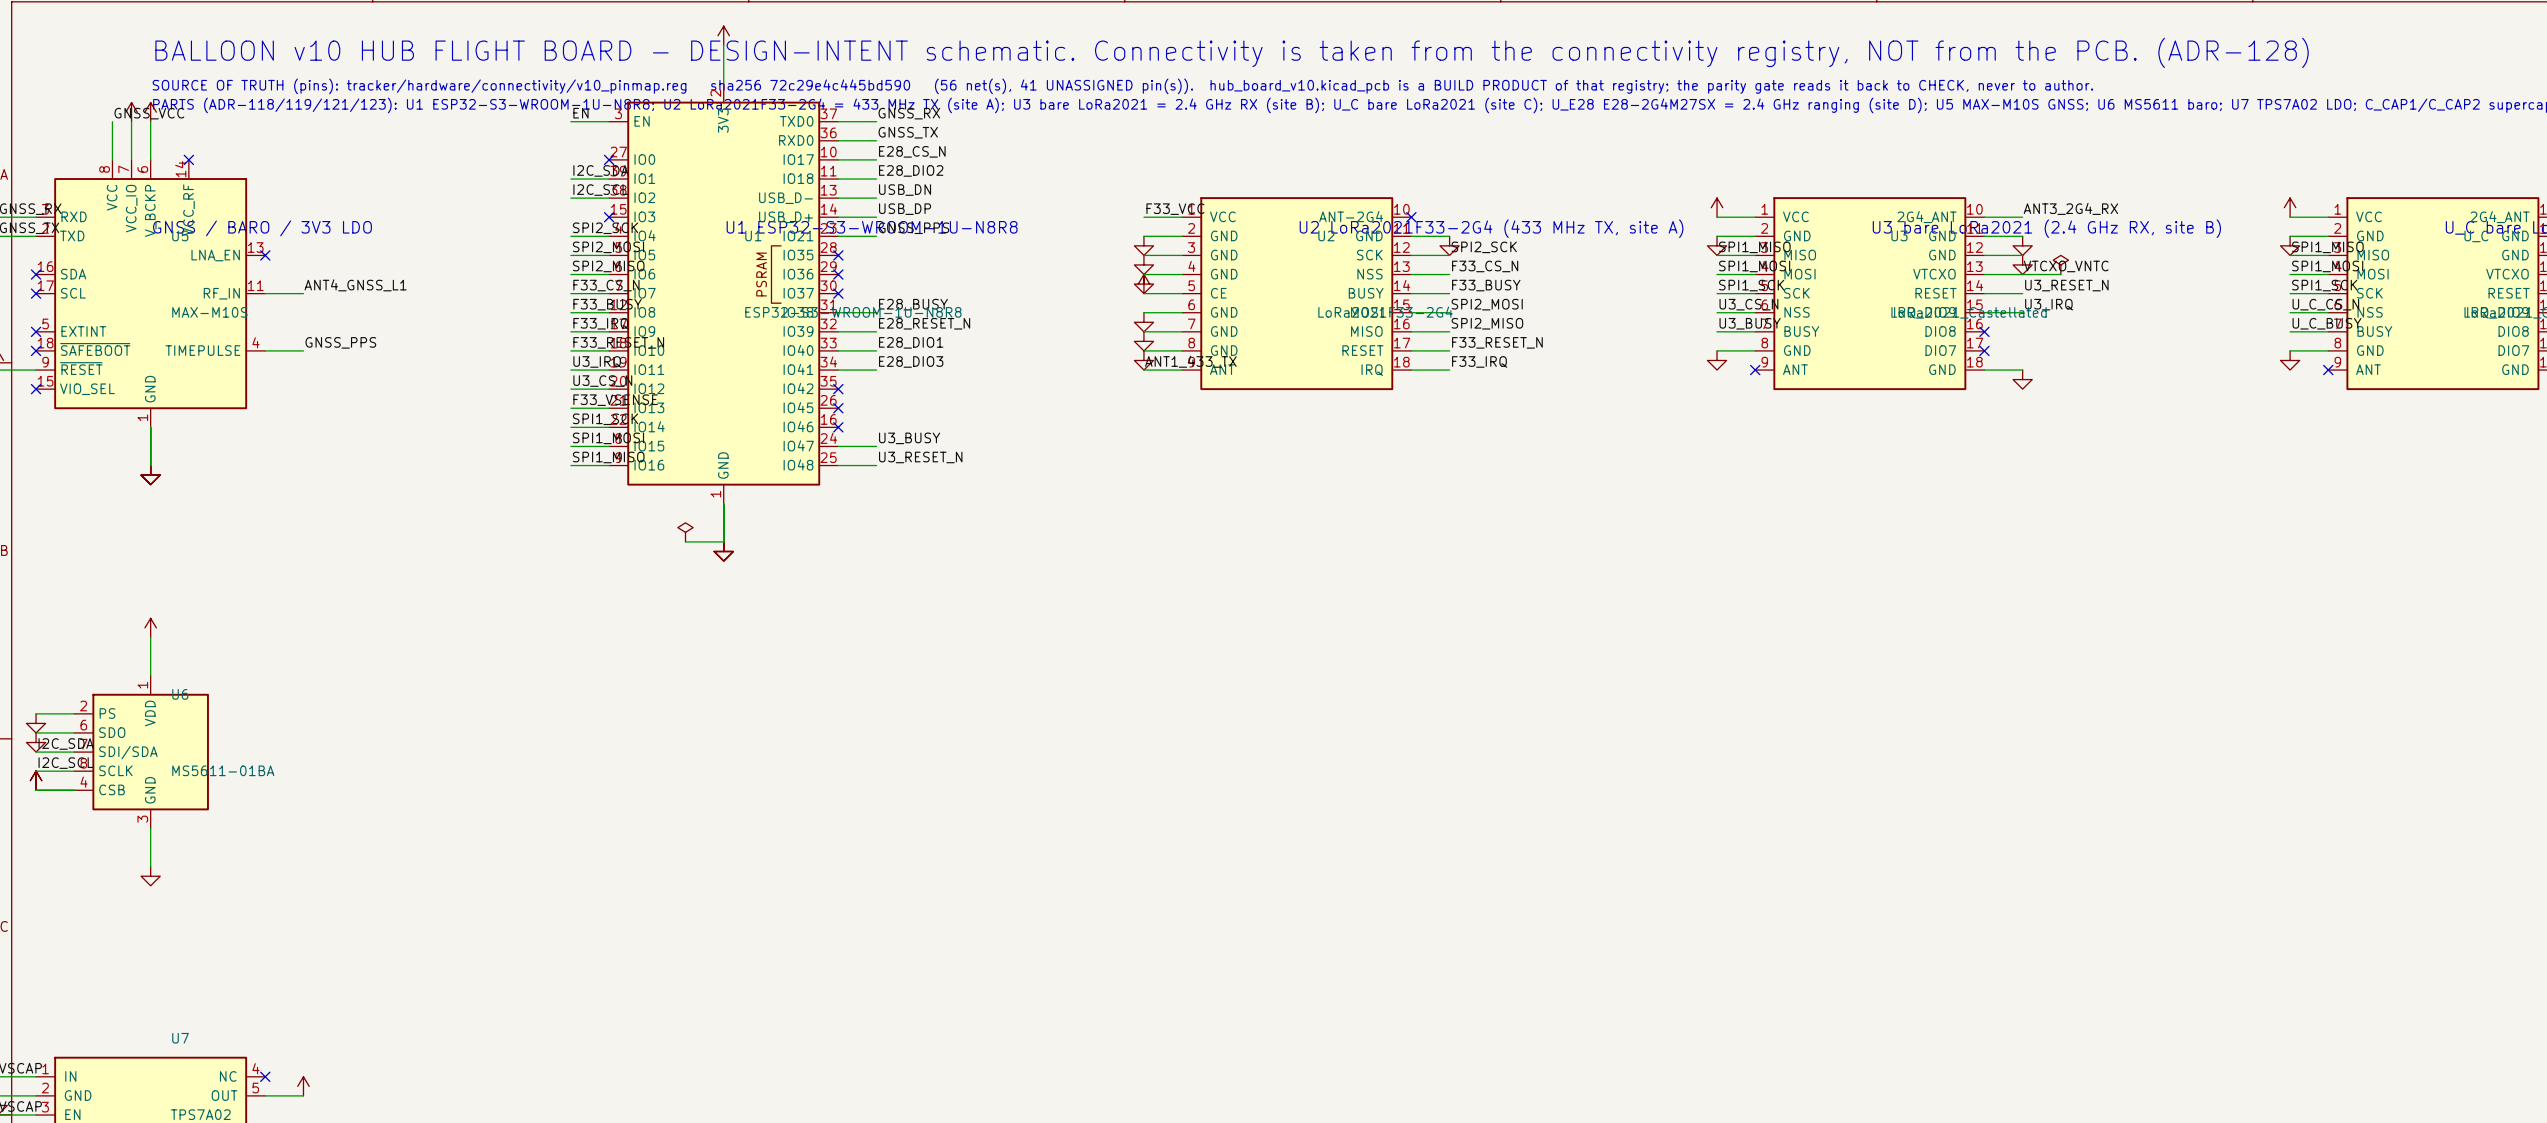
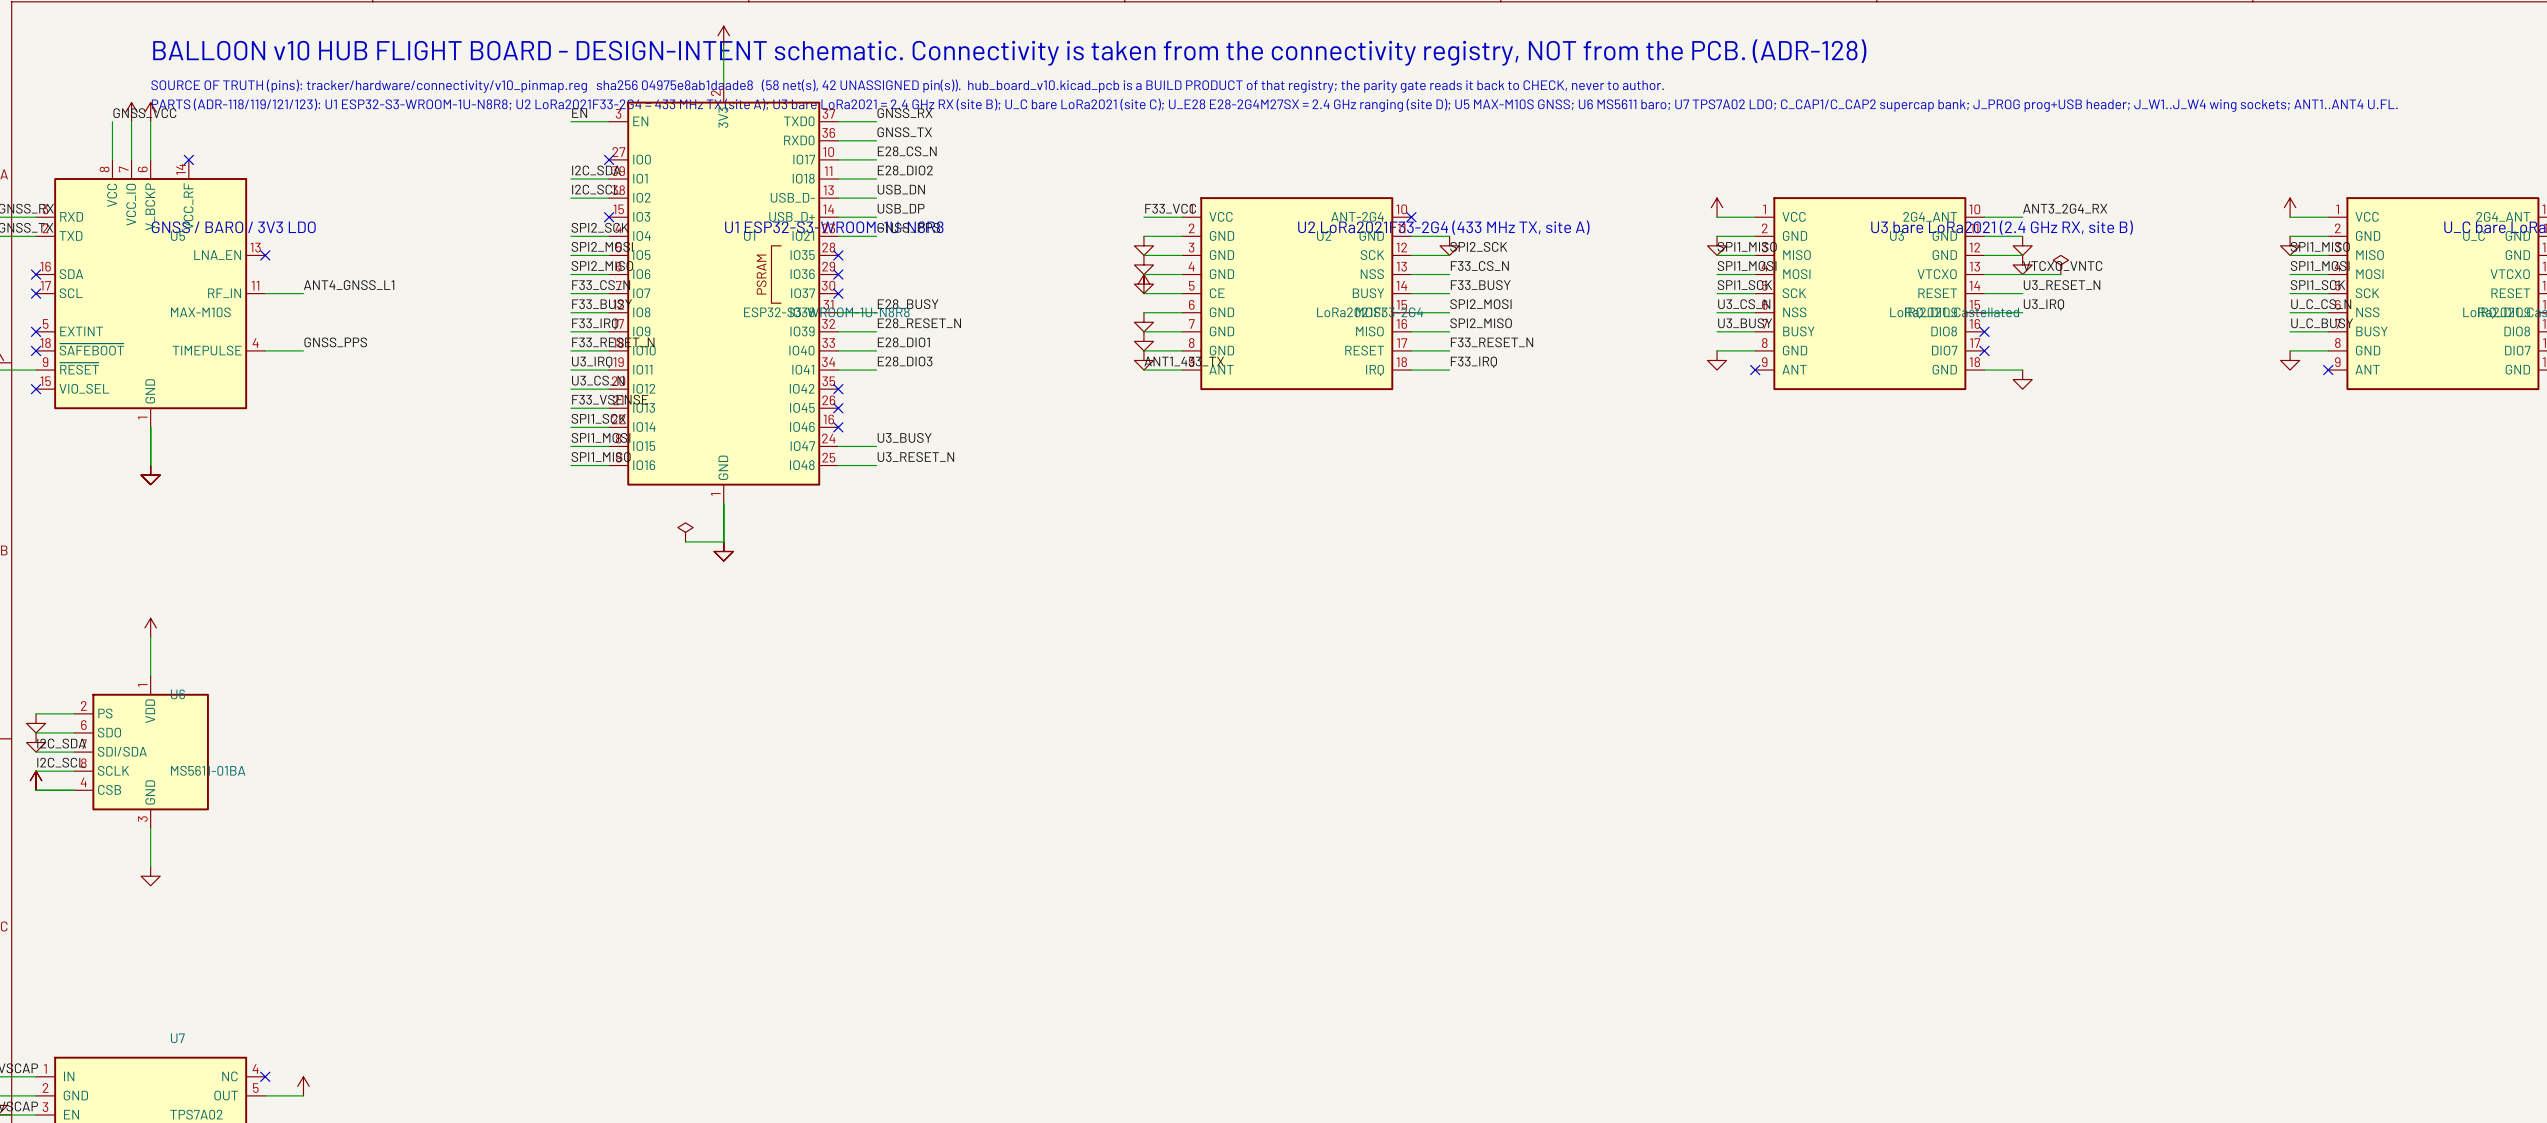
text: SOURCE OF TRUTH (pins): tracker/hardware/connectivity/v10_pinmap.reg sha256 72c29e4c445bd590 (56 net(s), 41 UNASSIGNED pin(s)). hub_board_v10.kicad_pcb is a BUILD PRODUCT of that registry; the parity gate reads it back to CHECK, never to author. (1122, 86) -> SOURCE OF TRUTH (pins): tracker/hardware/connectivity/v10_pinmap.reg sha256 04975e8ab1daade8 (58 net(s), 42 UNASSIGNED pin(s)). hub_board_v10.kicad_pcb is a BUILD PRODUCT of that registry; the parity gate reads it back to CHECK, never to author. (907, 86)

